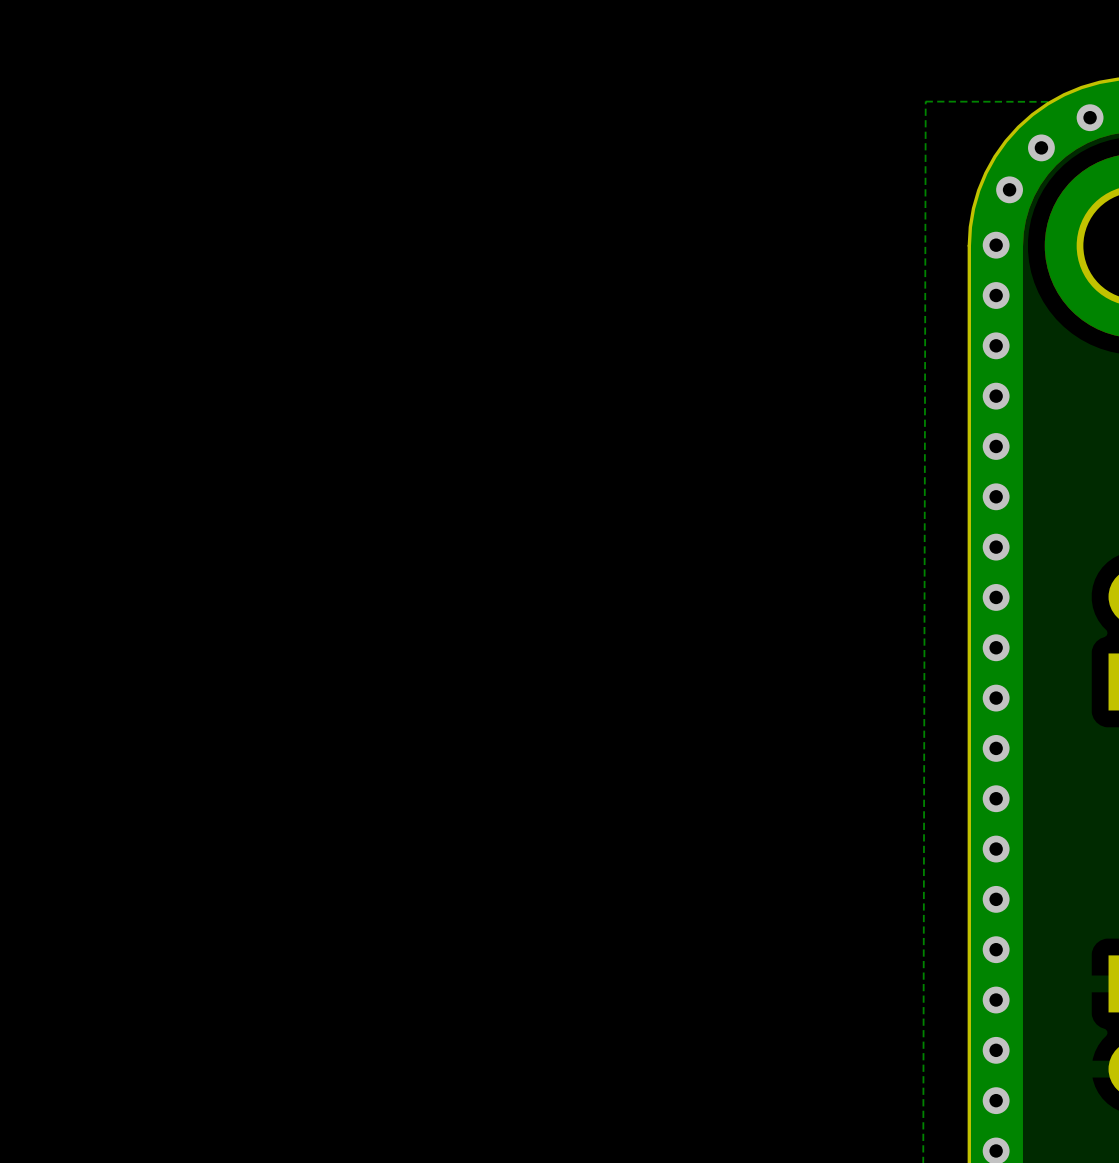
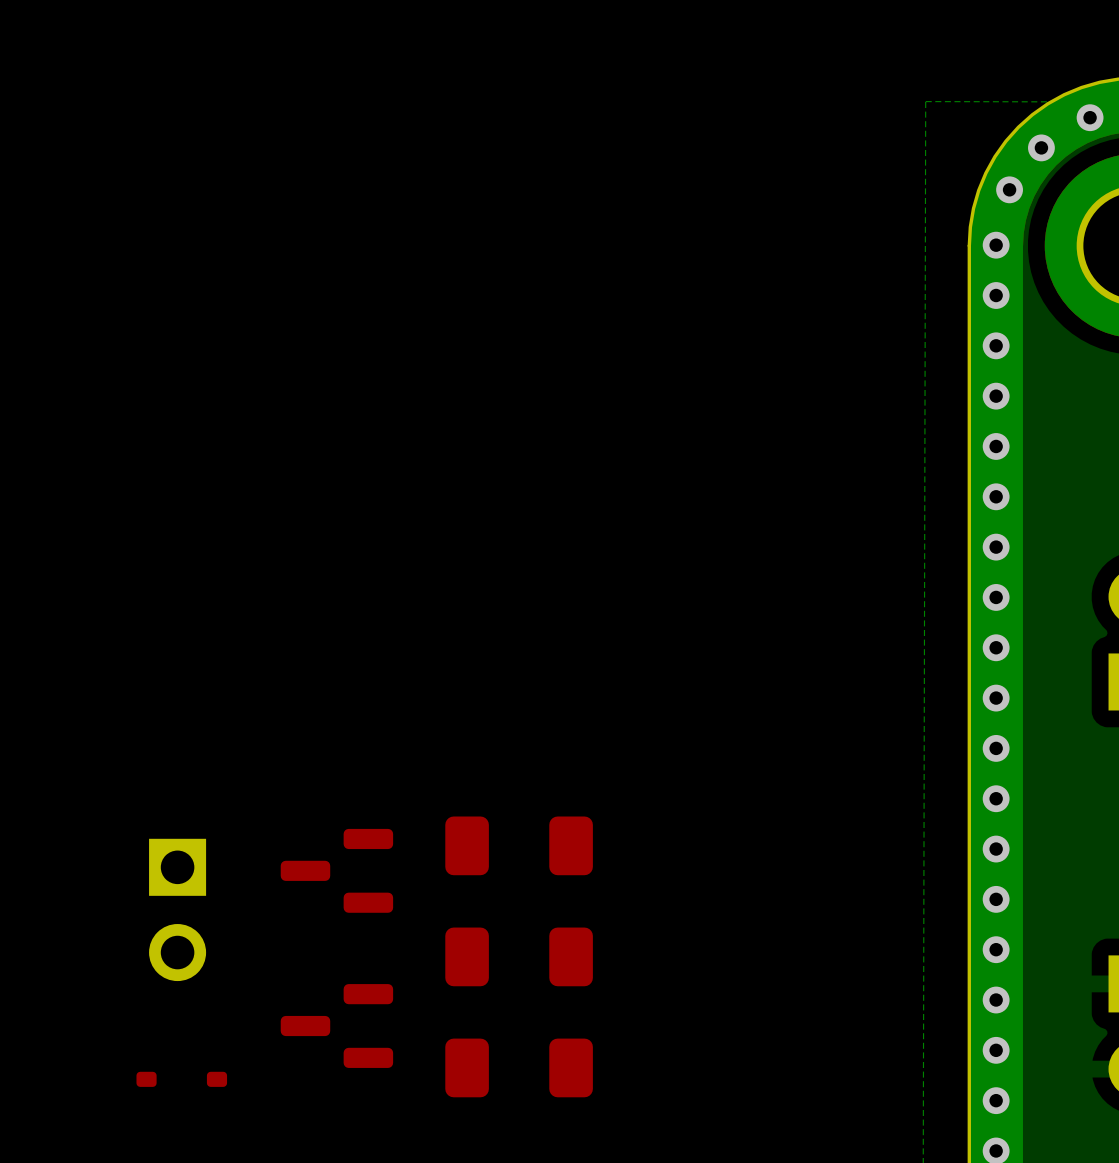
part: none -> (519, 845)
part: none -> (336, 870)
part: none -> (177, 909)
part: none -> (519, 956)
part: none -> (336, 1026)
part: none -> (519, 1067)
part: none -> (181, 1079)

